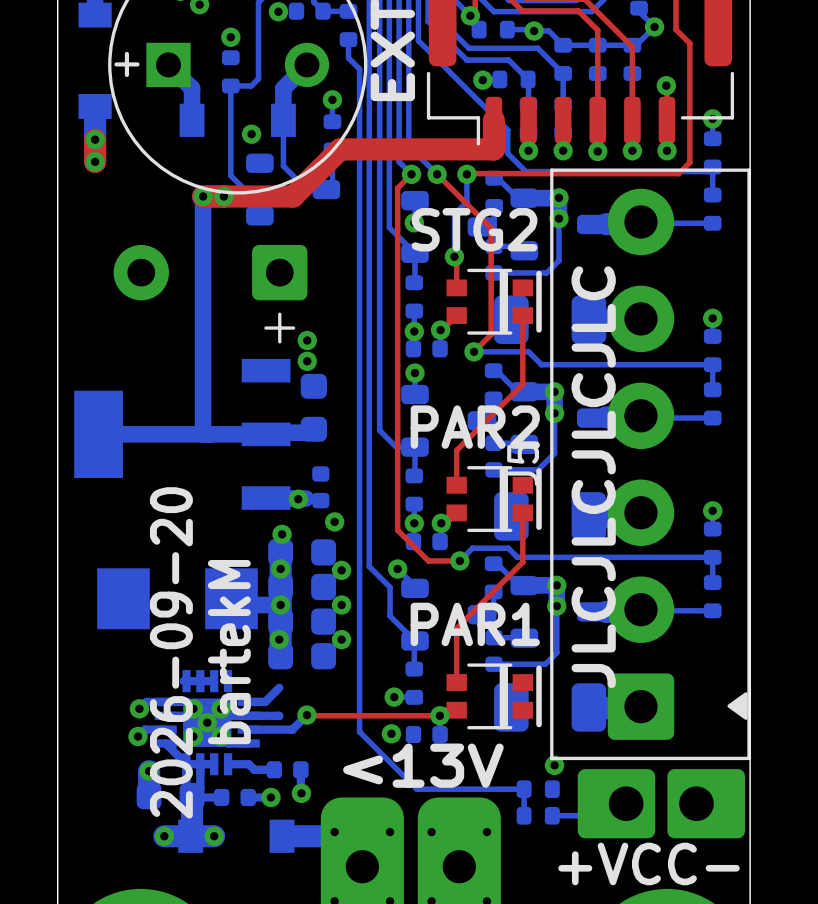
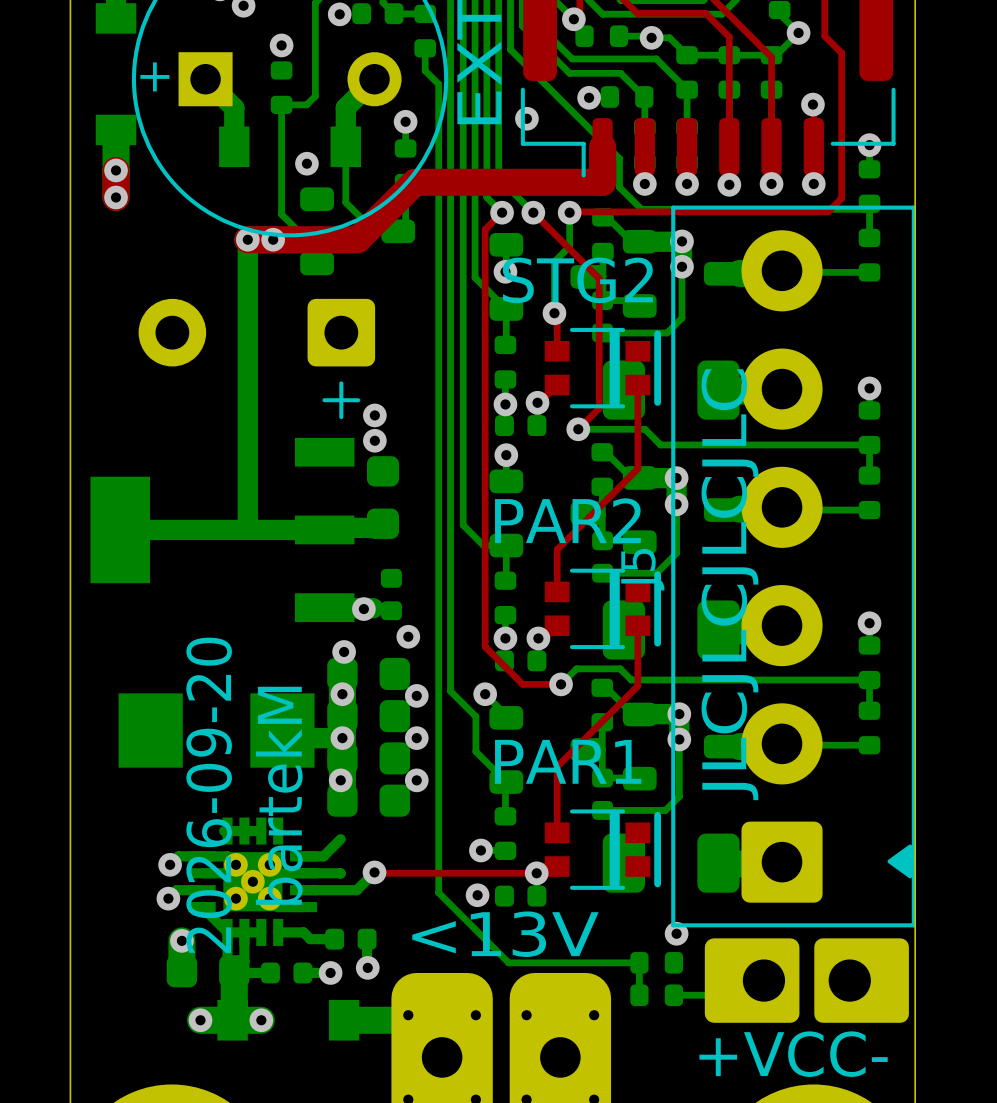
via: none -> (526, 118)

